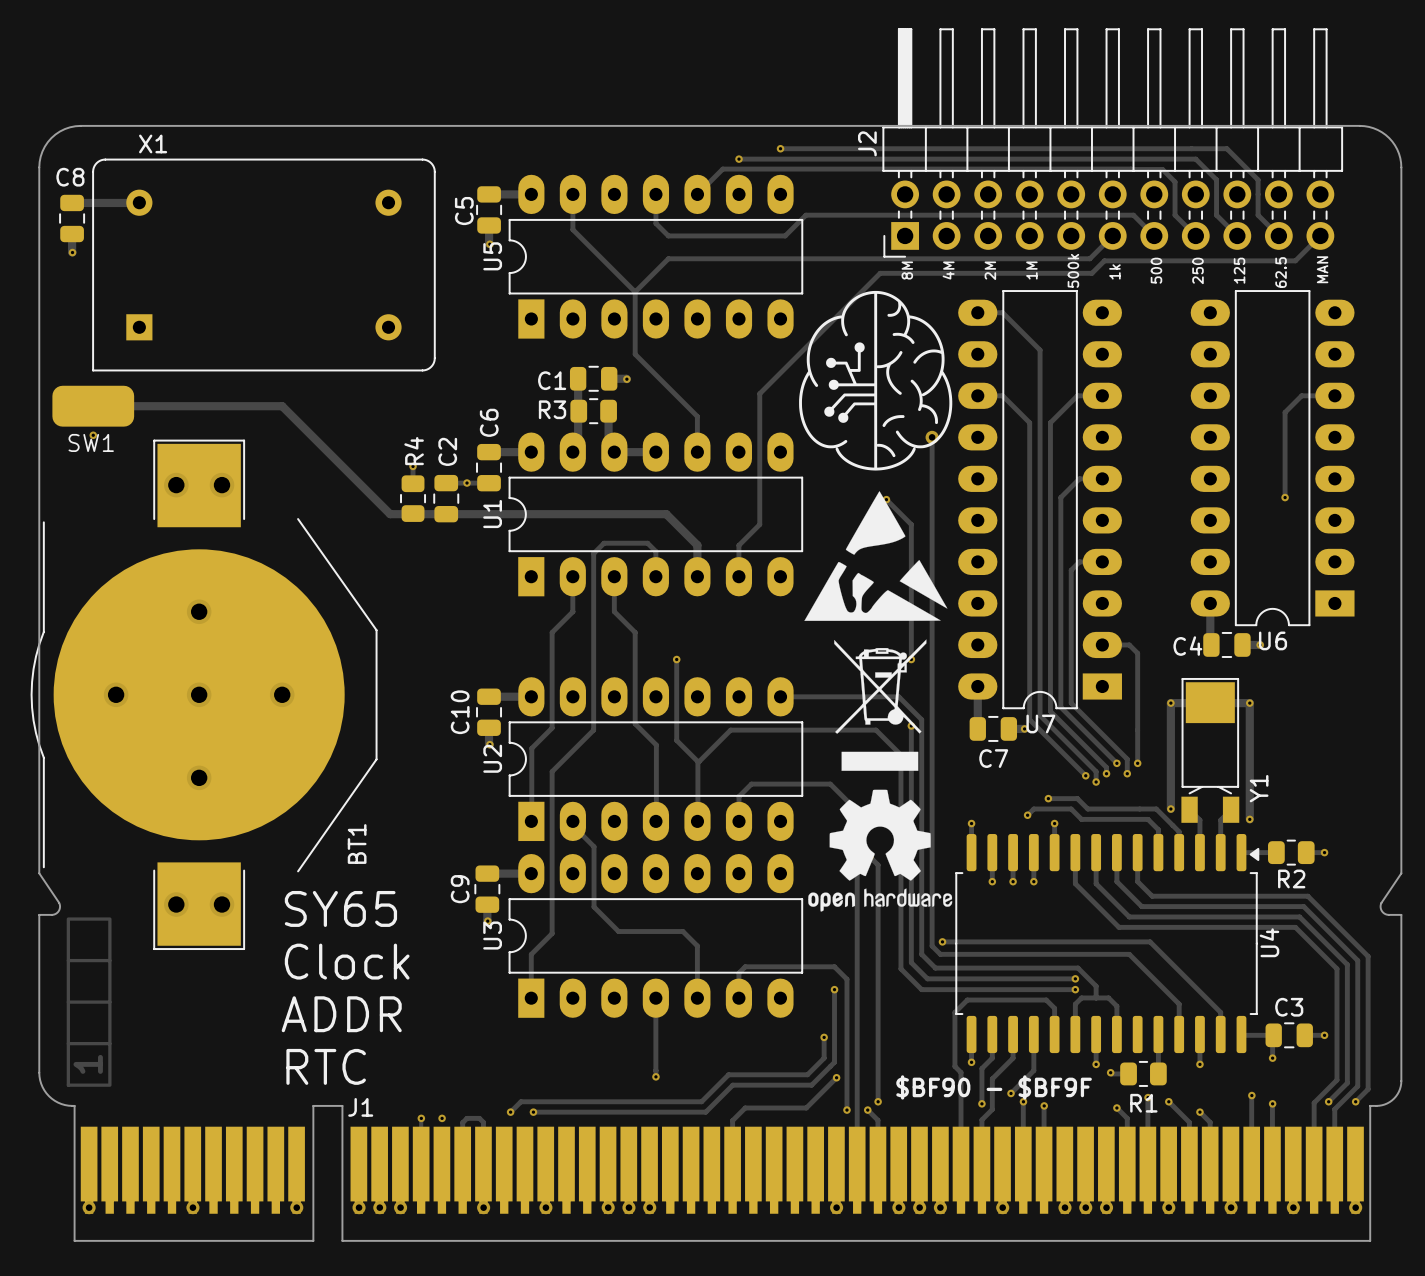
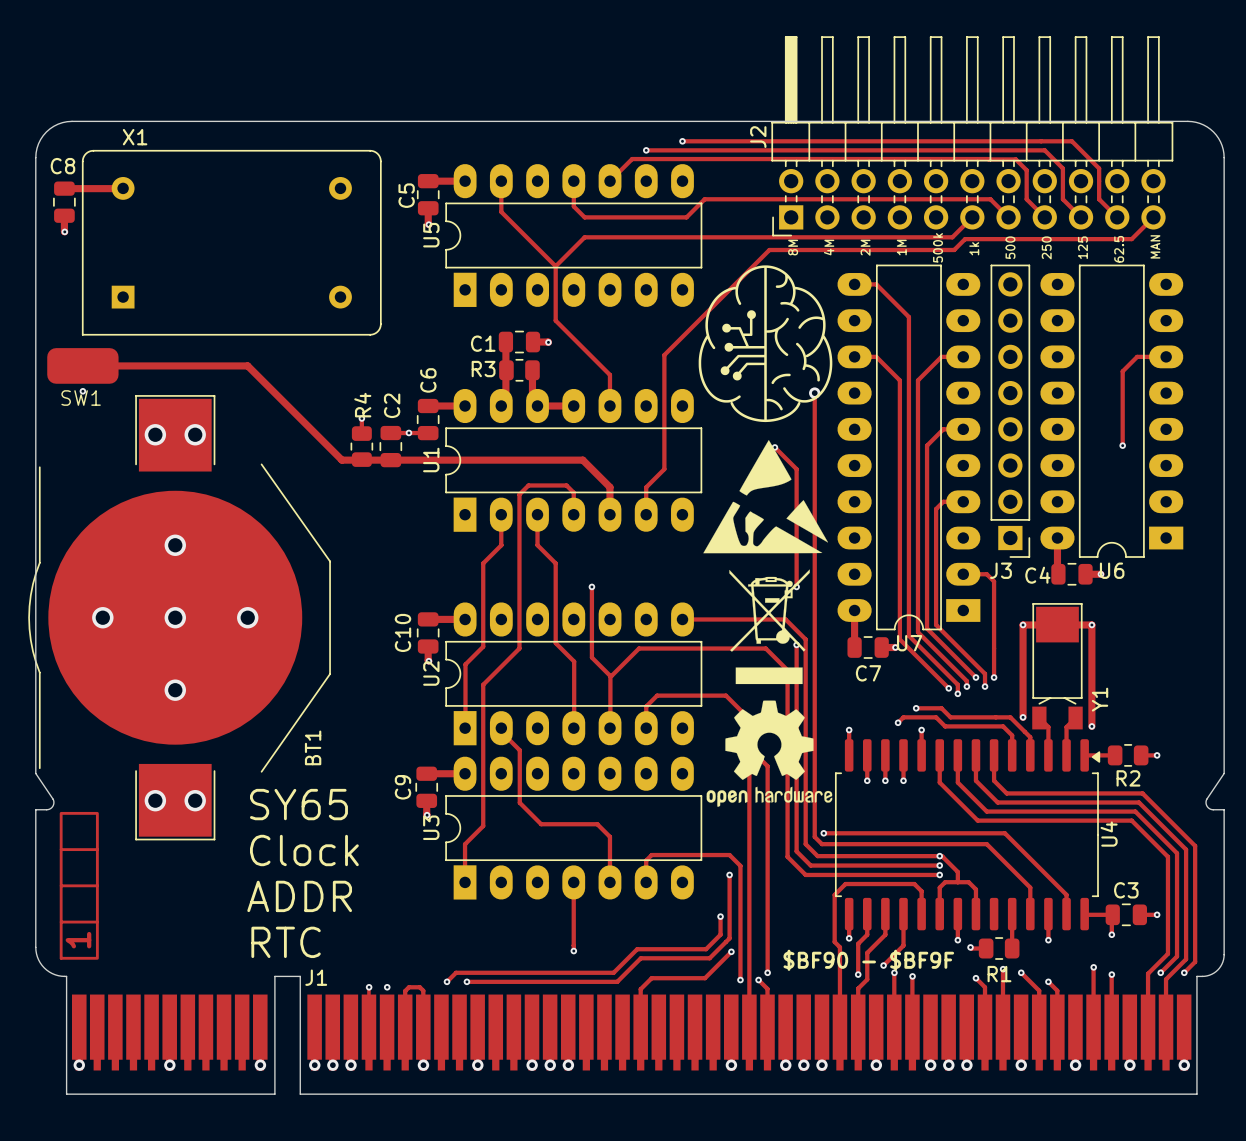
J3: none -> (1010, 411)
via: none -> (939, 856)

